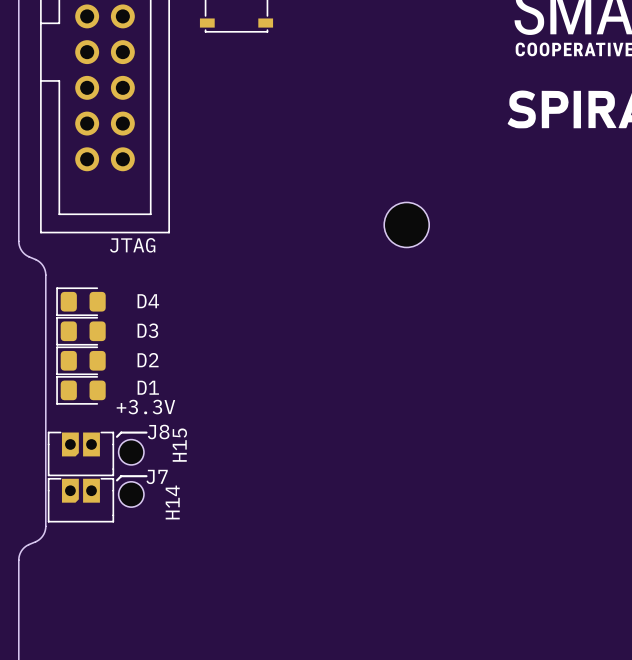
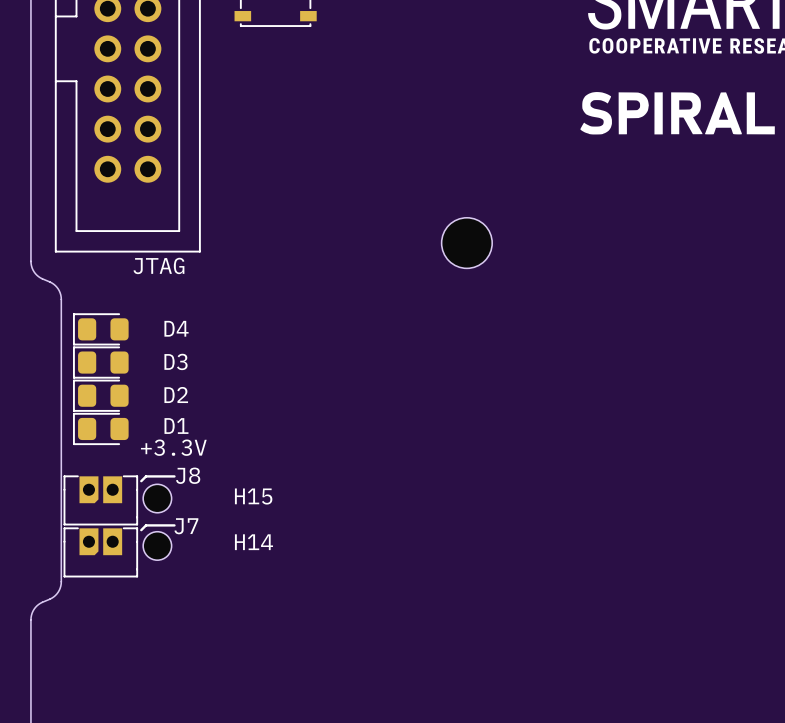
H15 name rotation: 0° (179, 445) -> 90° clockwise (253, 496)
H14 name rotation: 0° (172, 502) -> 90° clockwise (253, 542)

